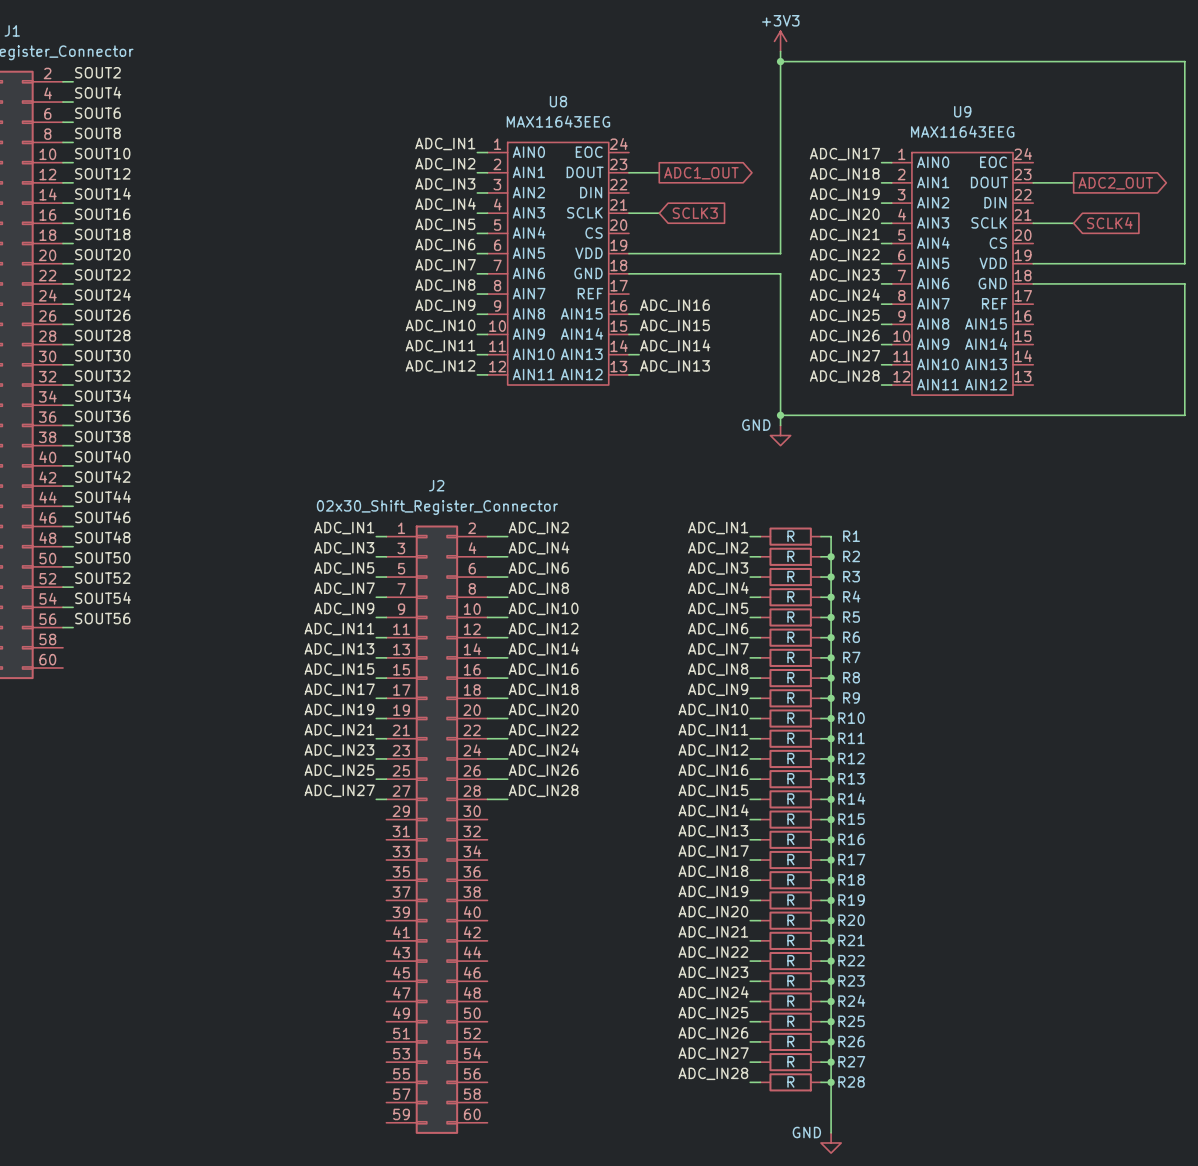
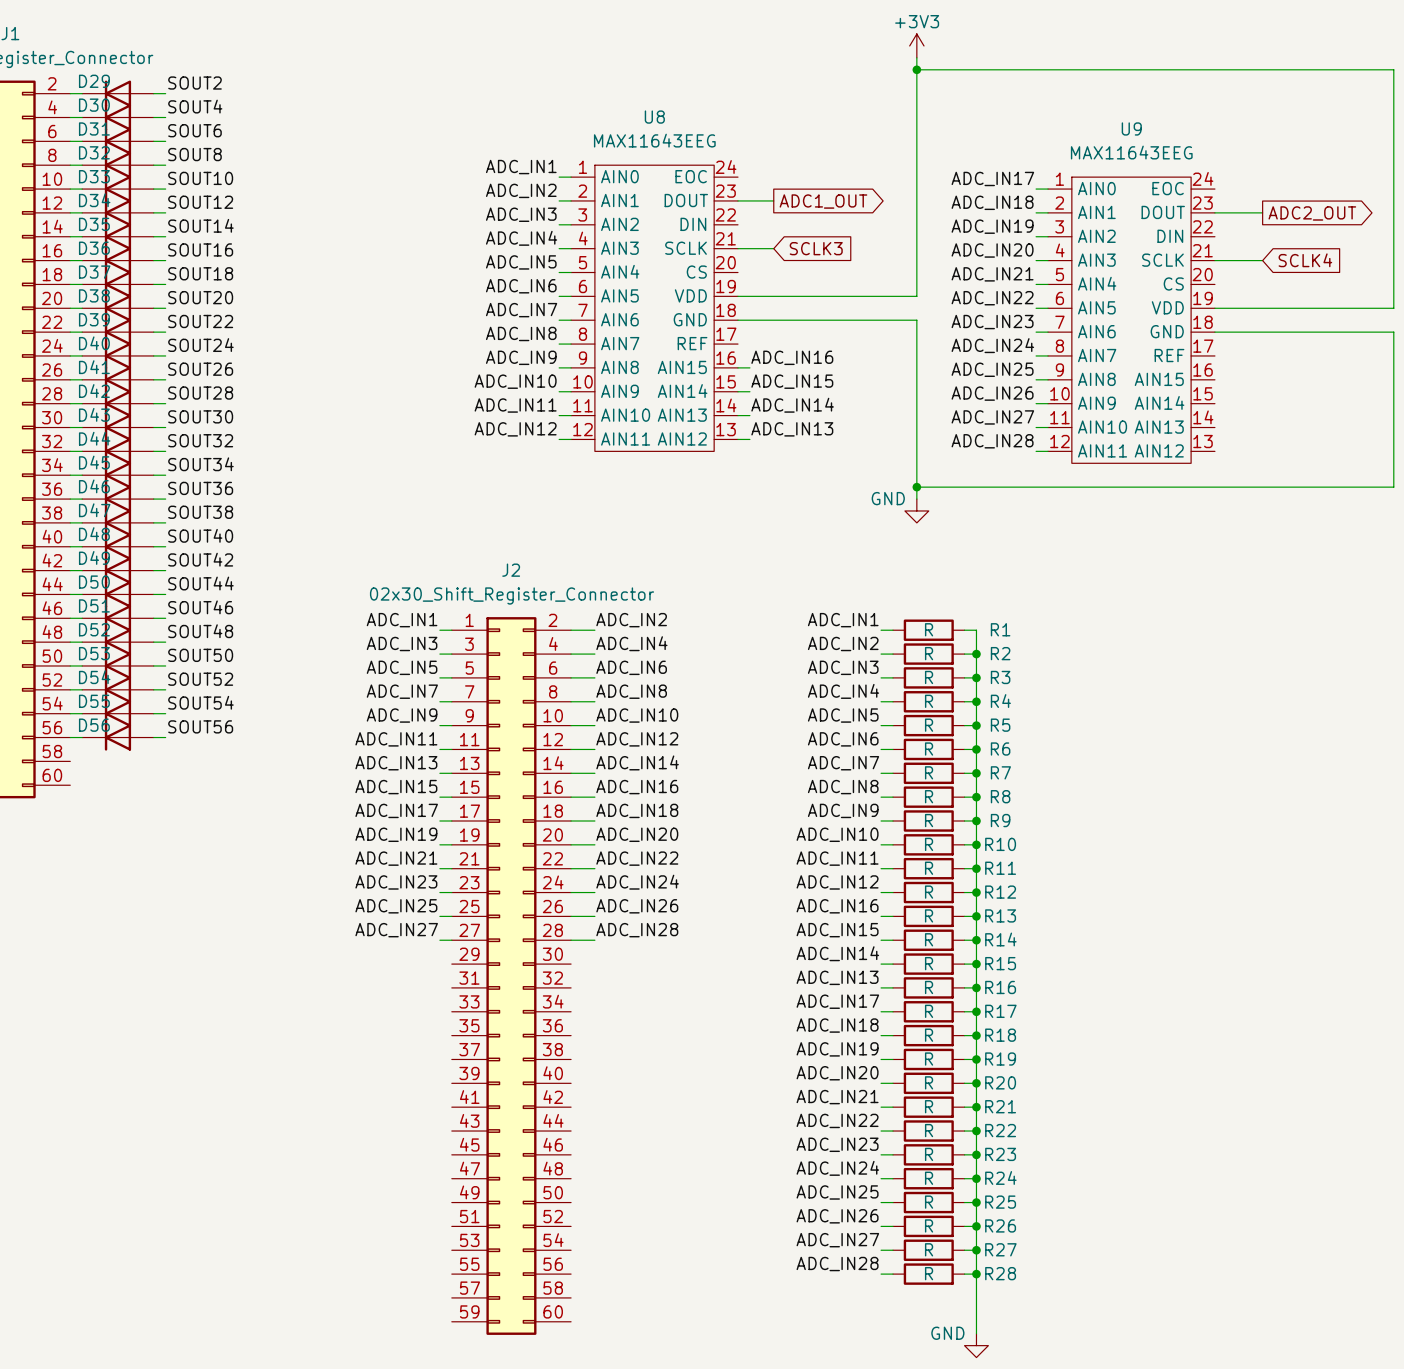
label position: SOUT2 (97, 72) -> SOUT2 (194, 83)
D29: none -> (117, 93)
wire: none -> (153, 93) (165, 93)
label position: SOUT4 (98, 92) -> SOUT4 (195, 106)
D30: none -> (117, 117)
wire: none -> (153, 117) (165, 117)
label position: SOUT6 (97, 113) -> SOUT6 (194, 130)
D31: none -> (117, 141)
wire: none -> (153, 141) (165, 141)
label position: SOUT8 (97, 133) -> SOUT8 (194, 154)
D32: none -> (117, 165)
wire: none -> (153, 165) (165, 165)
label position: SOUT10 (102, 153) -> SOUT10 (200, 178)
D33: none -> (117, 189)
wire: none -> (153, 189) (165, 189)
label position: SOUT12 (102, 173) -> SOUT12 (200, 202)
D34: none -> (117, 212)
wire: none -> (153, 212) (165, 212)
label position: SOUT14 (103, 193) -> SOUT14 (200, 225)
D35: none -> (117, 236)
wire: none -> (153, 236) (165, 236)
label position: SOUT16 (102, 214) -> SOUT16 (200, 249)
D36: none -> (117, 260)
wire: none -> (153, 260) (165, 260)
label position: SOUT18 (102, 234) -> SOUT18 (200, 273)
D37: none -> (117, 284)
wire: none -> (153, 284) (165, 284)
label position: SOUT20 (102, 254) -> SOUT20 (200, 297)
D38: none -> (117, 308)
wire: none -> (153, 308) (165, 308)
label position: SOUT22 (102, 274) -> SOUT22 (200, 321)
D39: none -> (117, 332)
wire: none -> (153, 332) (165, 332)
label position: SOUT24 (103, 294) -> SOUT24 (200, 345)
D40: none -> (117, 355)
wire: none -> (153, 355) (165, 355)
label position: SOUT26 (102, 315) -> SOUT26 (200, 369)
D41: none -> (117, 379)
wire: none -> (153, 379) (165, 379)
label position: SOUT28 (102, 335) -> SOUT28 (200, 393)
D42: none -> (117, 403)
wire: none -> (153, 403) (165, 403)
label position: SOUT30 (102, 355) -> SOUT30 (200, 416)
D43: none -> (117, 427)
wire: none -> (153, 427) (165, 427)
label position: SOUT32 (102, 375) -> SOUT32 (200, 440)
D44: none -> (117, 451)
wire: none -> (153, 451) (165, 451)
label position: SOUT34 (103, 395) -> SOUT34 (200, 464)
D45: none -> (117, 475)
wire: none -> (153, 475) (165, 475)
label position: SOUT36 (102, 416) -> SOUT36 (200, 488)
D46: none -> (117, 499)
wire: none -> (153, 499) (165, 499)
label position: SOUT38 (102, 436) -> SOUT38 (200, 512)
D47: none -> (117, 522)
wire: none -> (153, 522) (165, 522)
label position: SOUT40 (102, 456) -> SOUT40 (200, 535)
D48: none -> (117, 546)
wire: none -> (153, 546) (165, 546)
label position: SOUT42 (102, 476) -> SOUT42 (200, 559)
D49: none -> (117, 570)
wire: none -> (153, 570) (165, 570)
label position: SOUT44 (103, 497) -> SOUT44 (200, 583)
D50: none -> (117, 594)
wire: none -> (153, 594) (165, 594)
label position: SOUT46 (102, 517) -> SOUT46 (200, 607)
D51: none -> (117, 618)
wire: none -> (153, 618) (165, 618)
label position: SOUT48 (102, 537) -> SOUT48 (200, 631)
D52: none -> (117, 642)
wire: none -> (153, 642) (165, 642)
label position: SOUT50 (102, 557) -> SOUT50 (200, 655)
D53: none -> (117, 665)
wire: none -> (153, 665) (165, 665)
label position: SOUT52 (102, 578) -> SOUT52 (200, 679)
D54: none -> (117, 689)
wire: none -> (153, 689) (165, 689)
label position: SOUT54 (103, 598) -> SOUT54 (200, 702)
D55: none -> (117, 713)
wire: none -> (153, 713) (165, 713)
label position: SOUT56 (102, 618) -> SOUT56 (200, 726)
D56: none -> (117, 737)
wire: none -> (153, 737) (165, 737)

